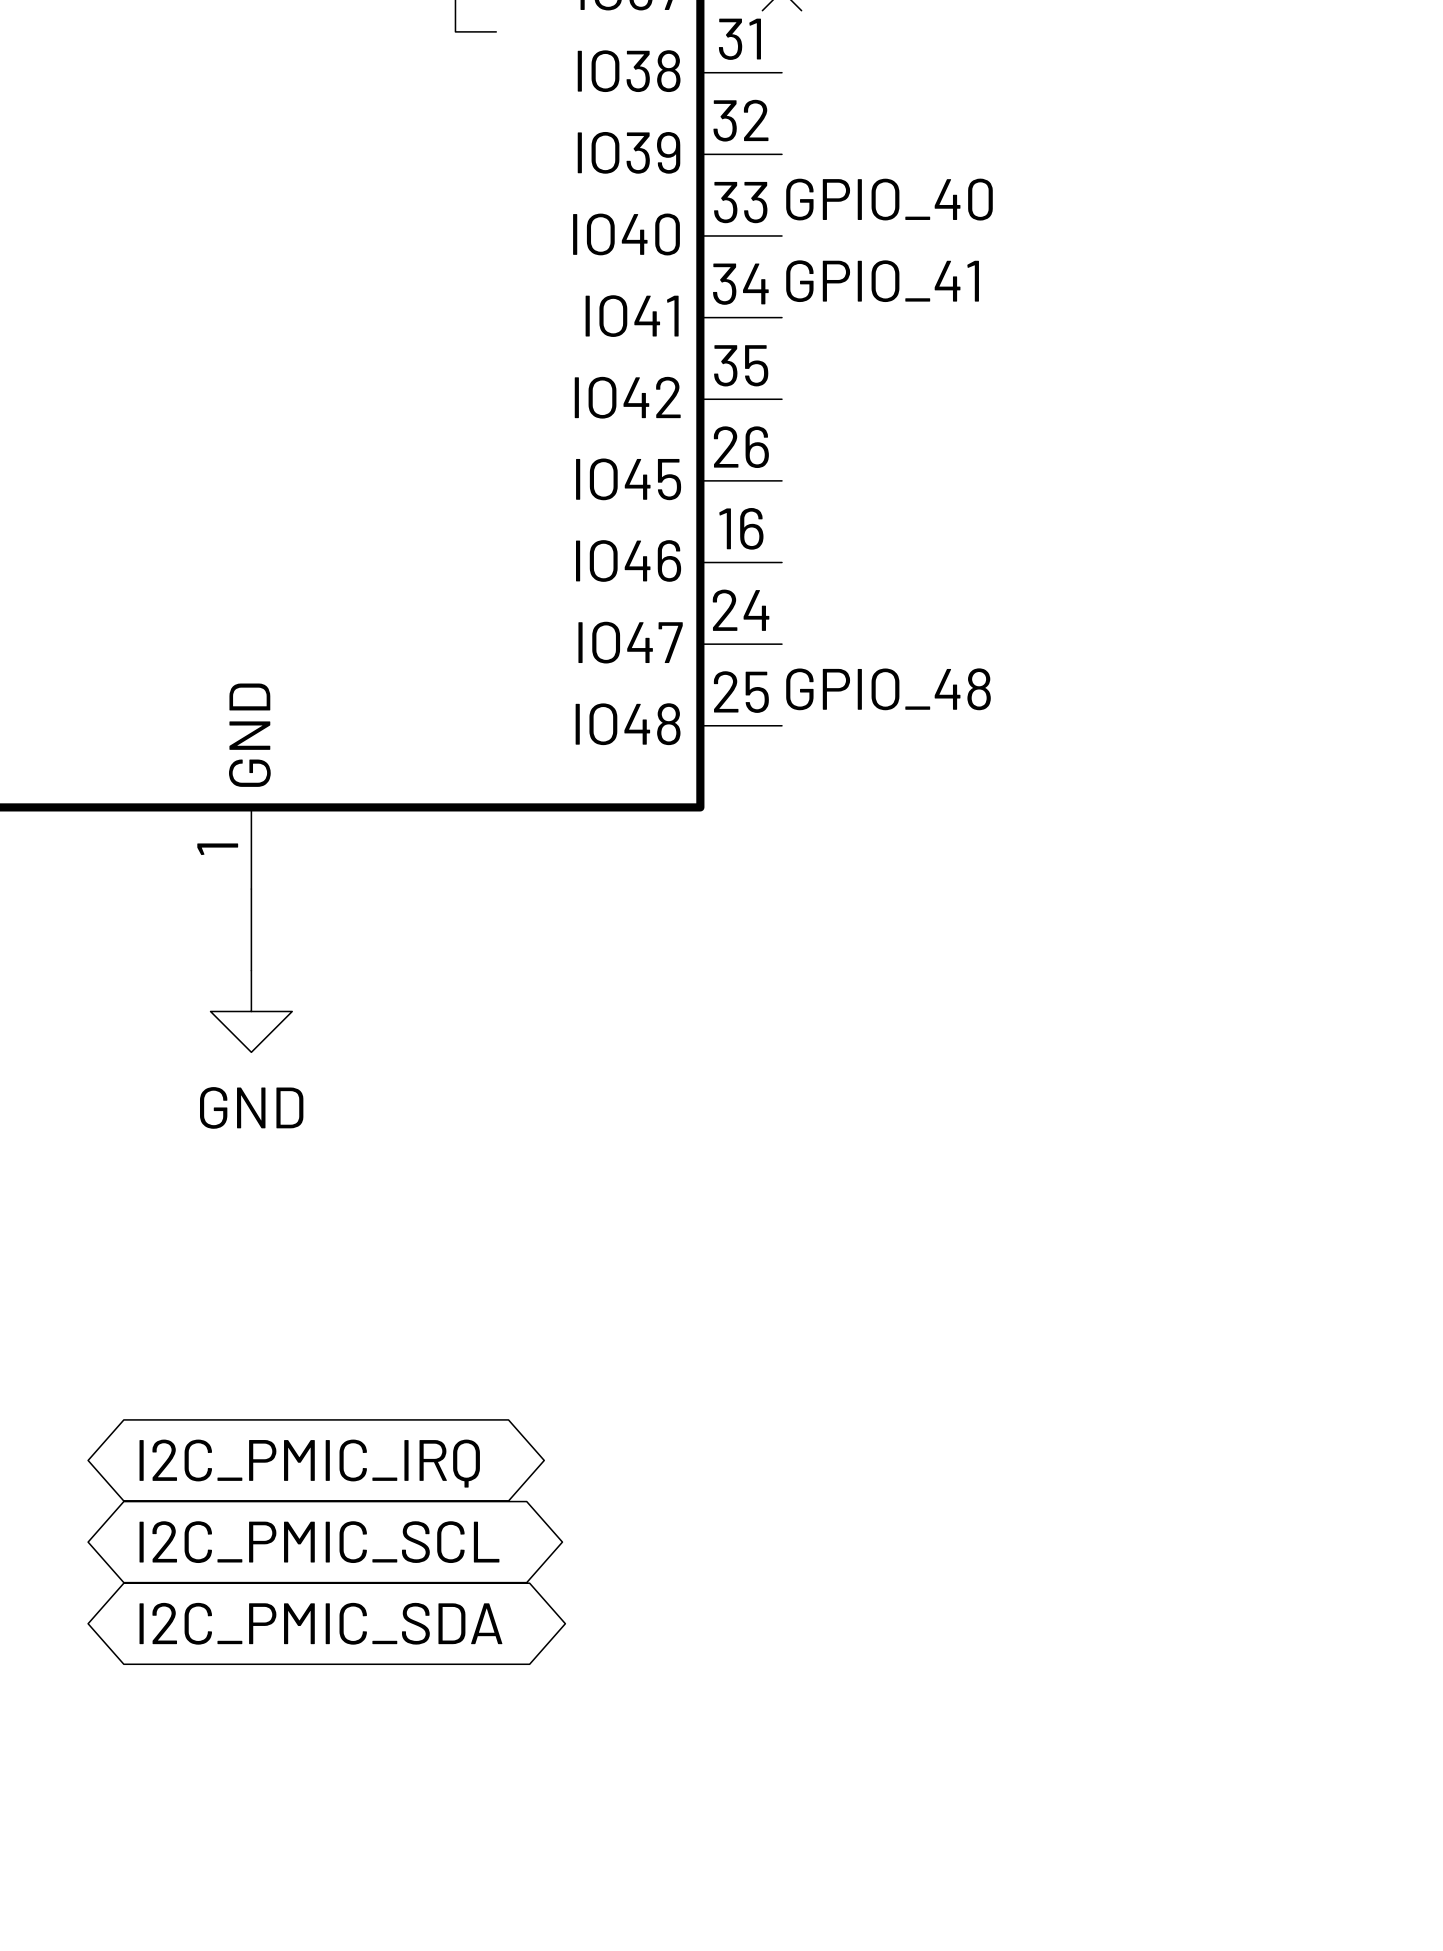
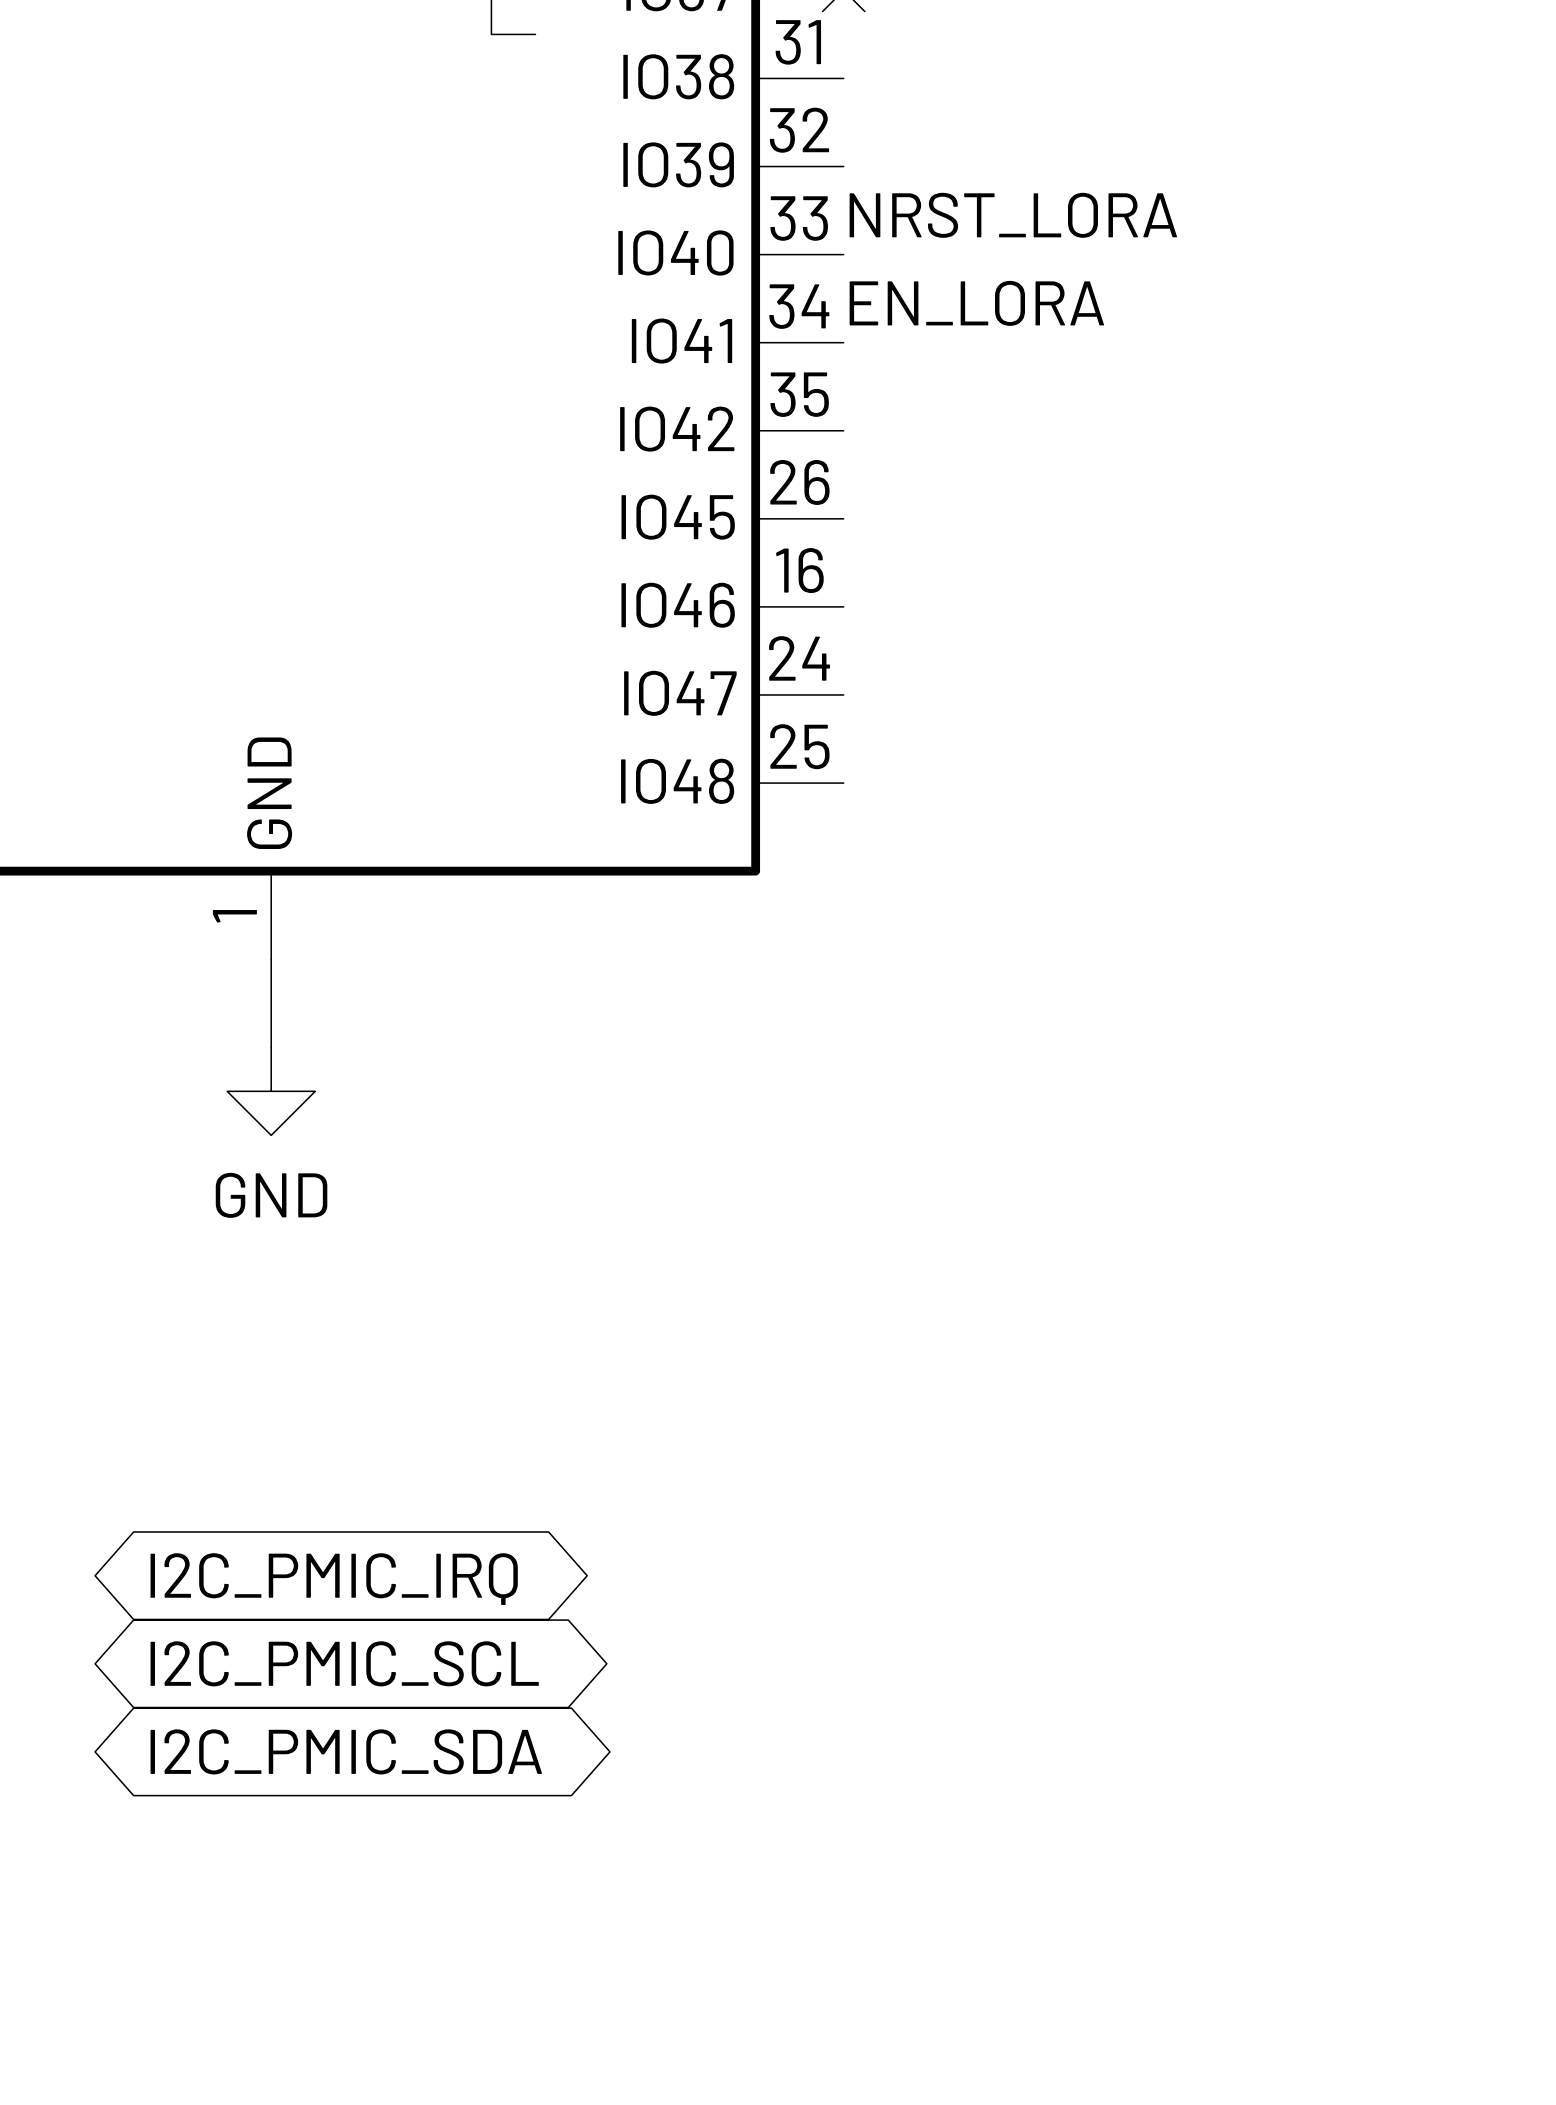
label: GPIO_40 (889, 199) -> NRST_LORA (1013, 215)
label: GPIO_41 (882, 281) -> EN_LORA (976, 303)
label: GPIO_48 (888, 689) -> none

